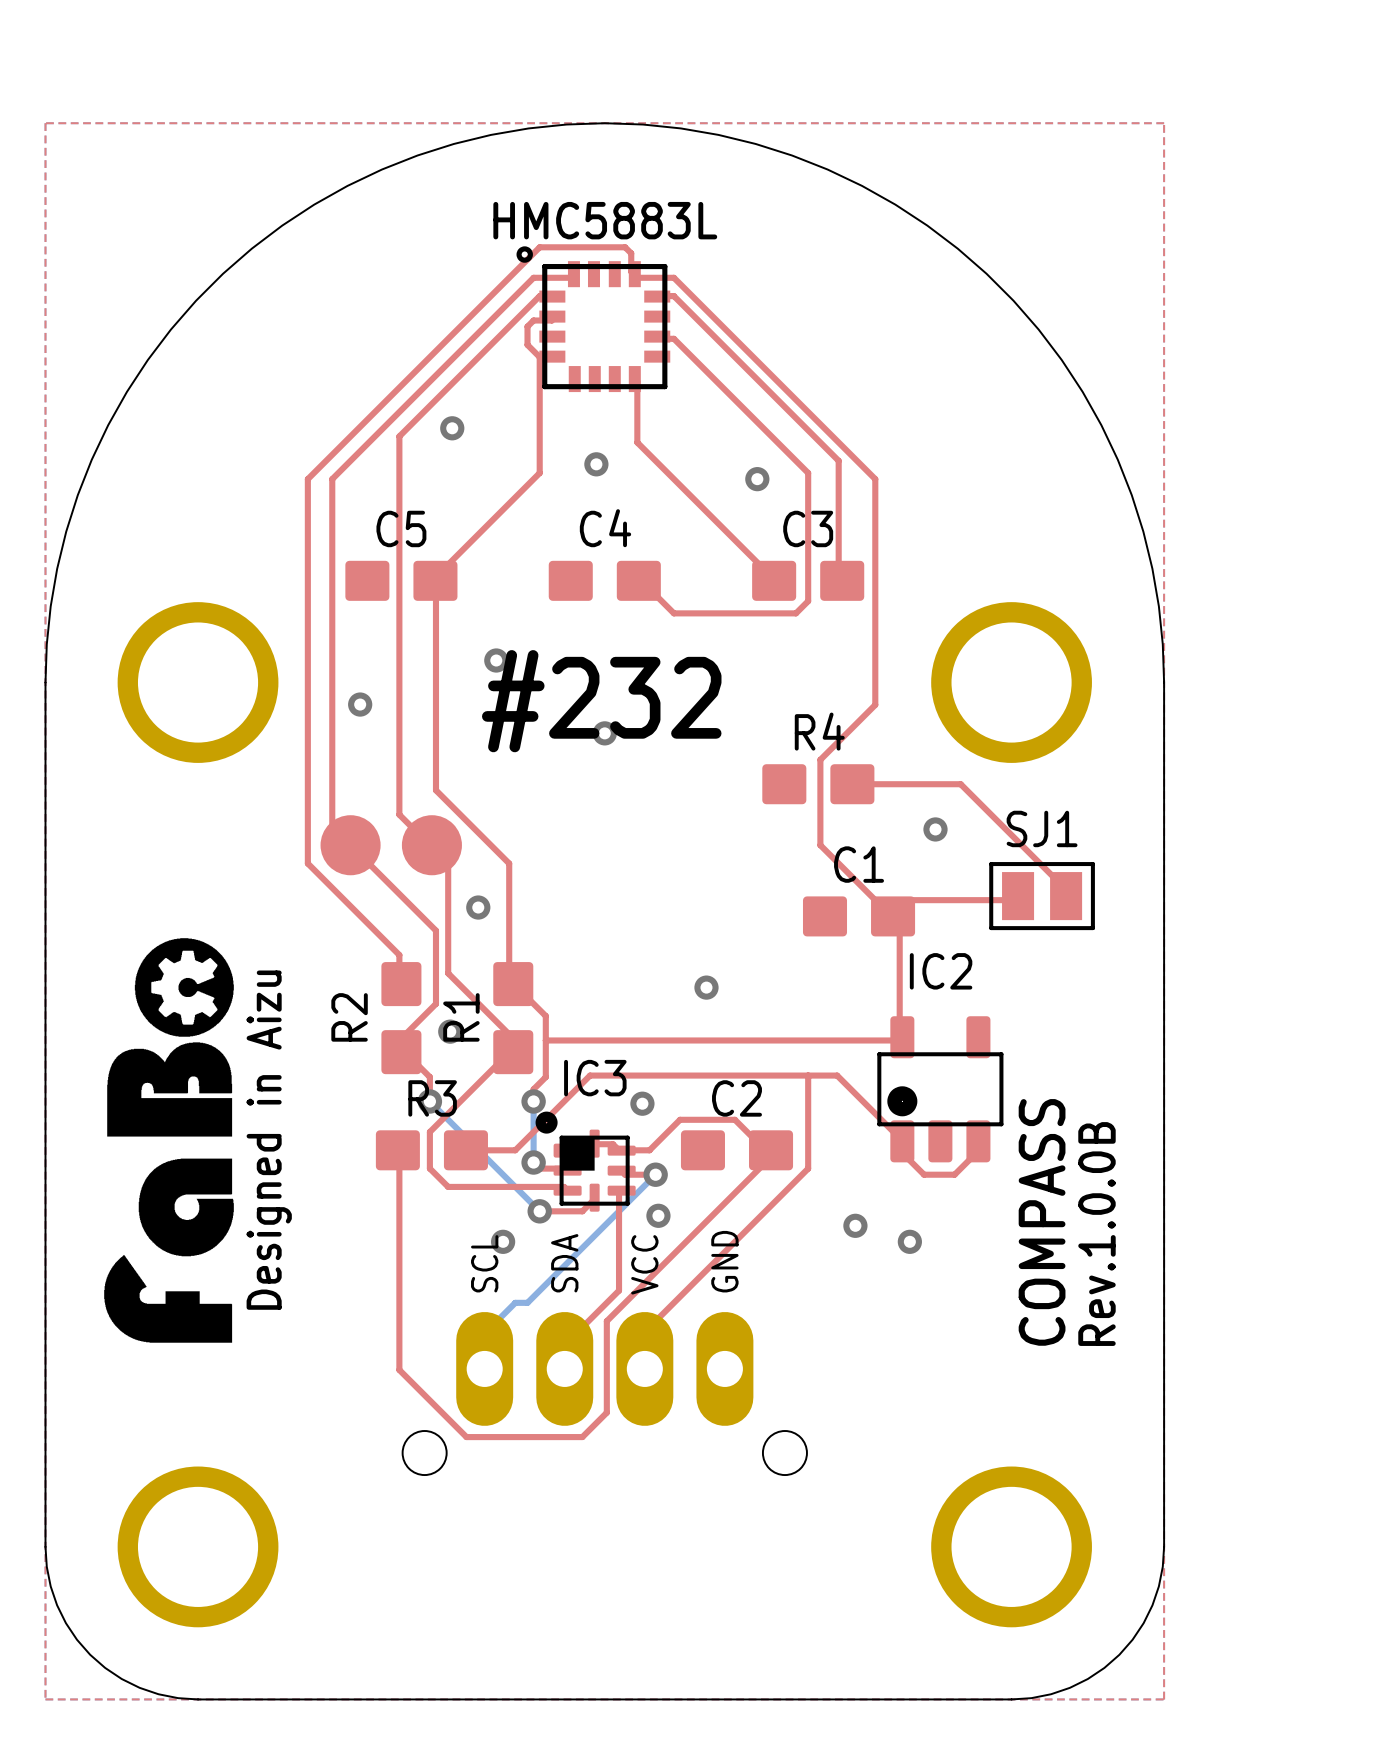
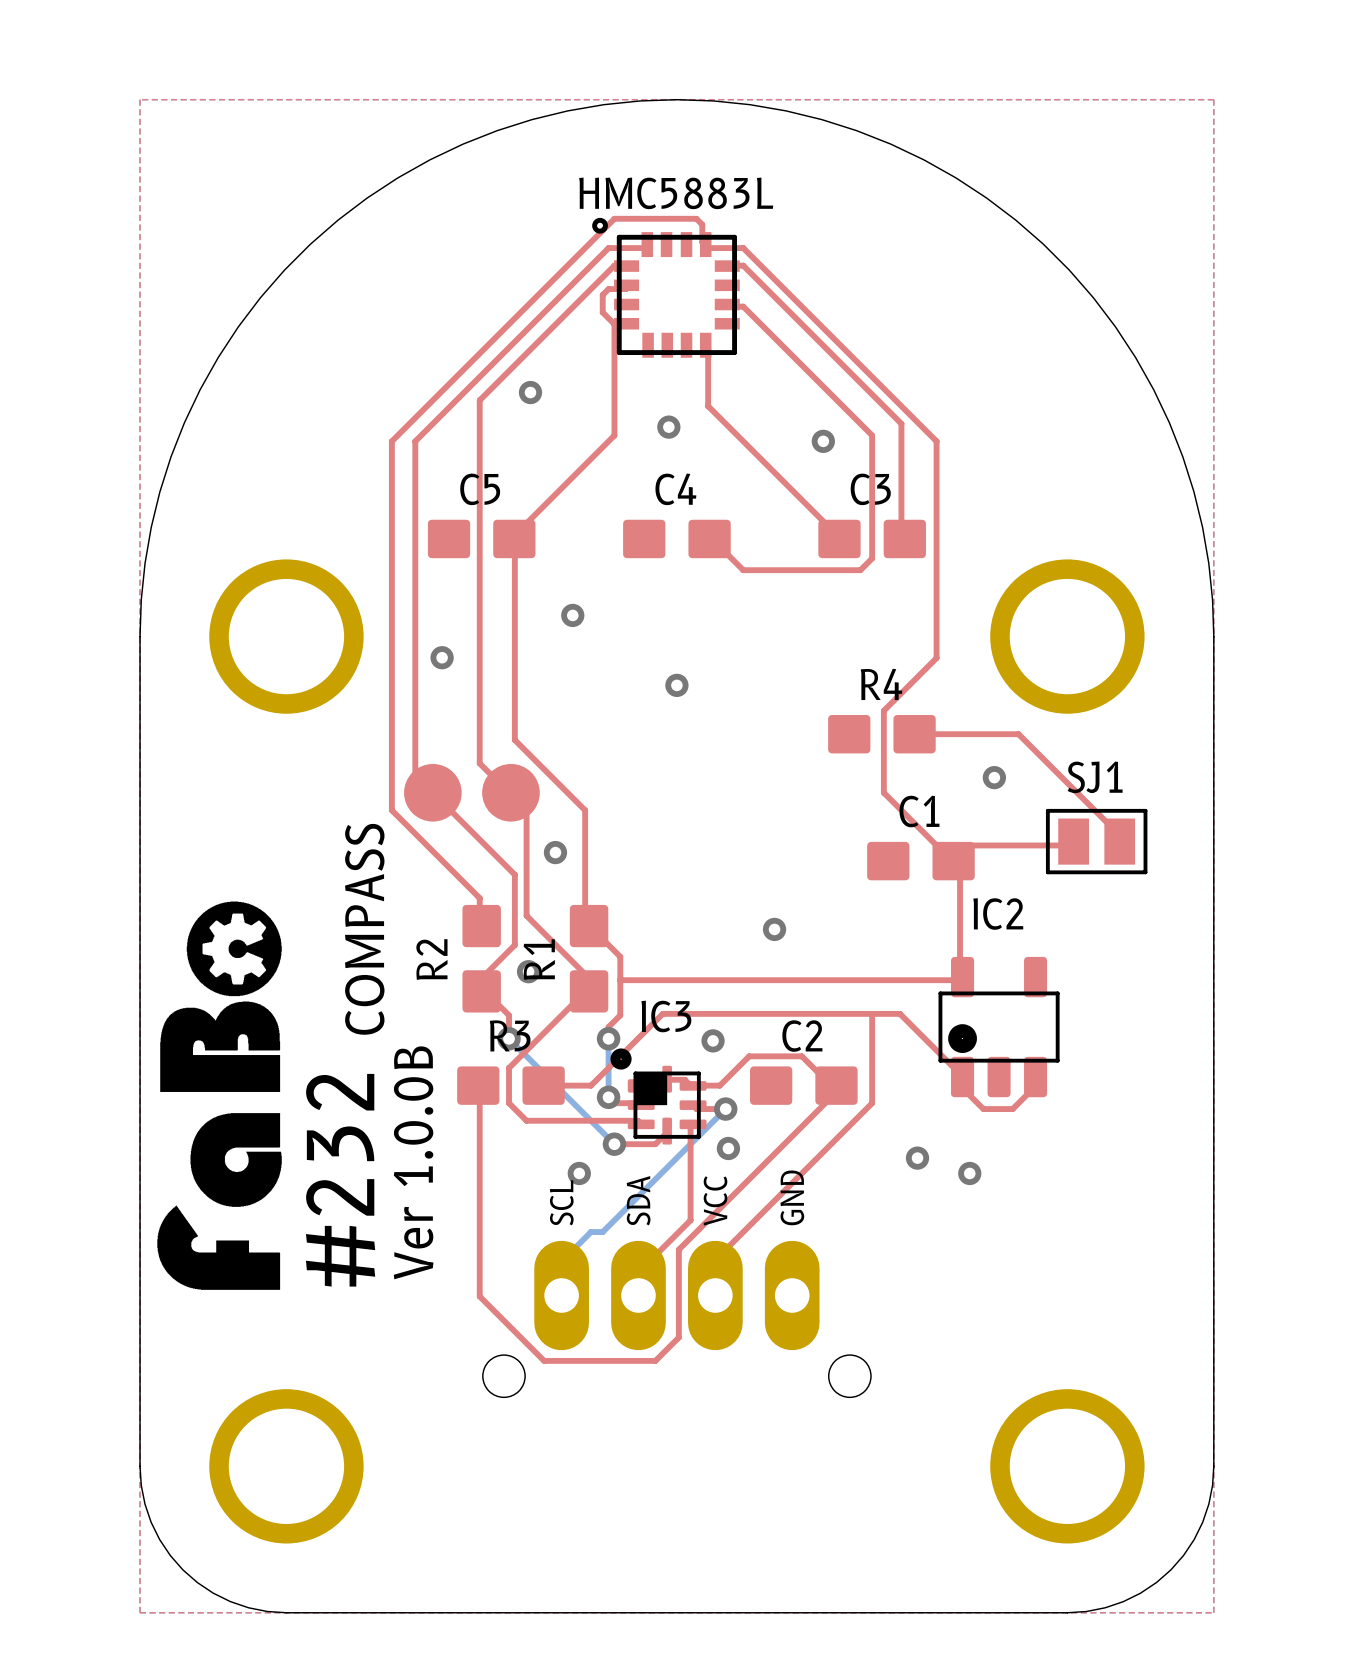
text rotation: 0° (601, 701) -> 90° counterclockwise (340, 1180)
text position: #232 (601, 701) -> #232 (340, 1180)
drawing position: (169, 1140) -> (219, 1095)
text: Designed in Aizu (269, 1140) -> none
text: none -> Ver 1.0.0B (413, 1162)
text position: COMPASS (1042, 1222) -> COMPASS (364, 929)
text: Rev.1.0.0B (1096, 1234) -> none

